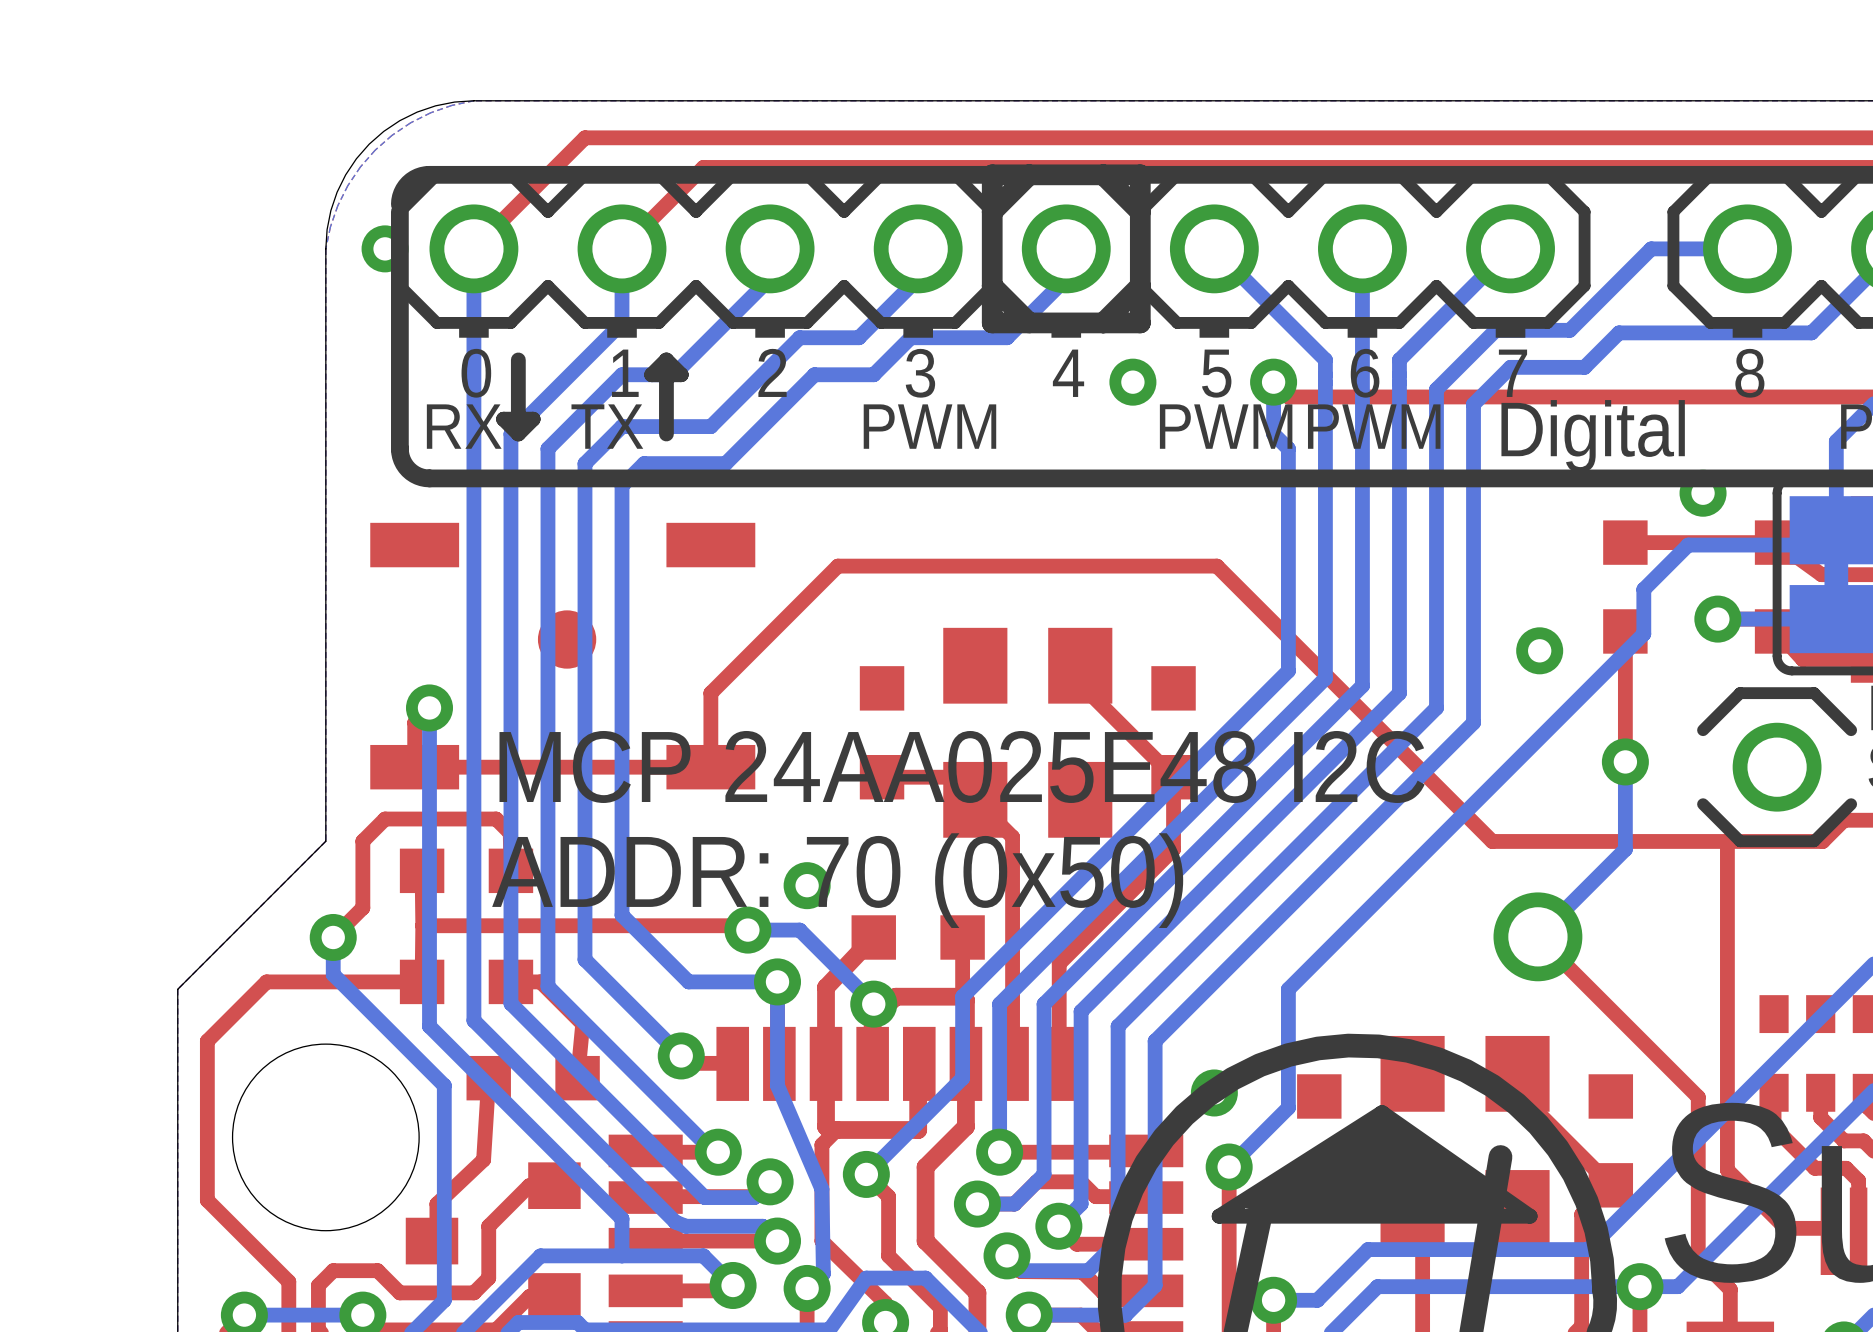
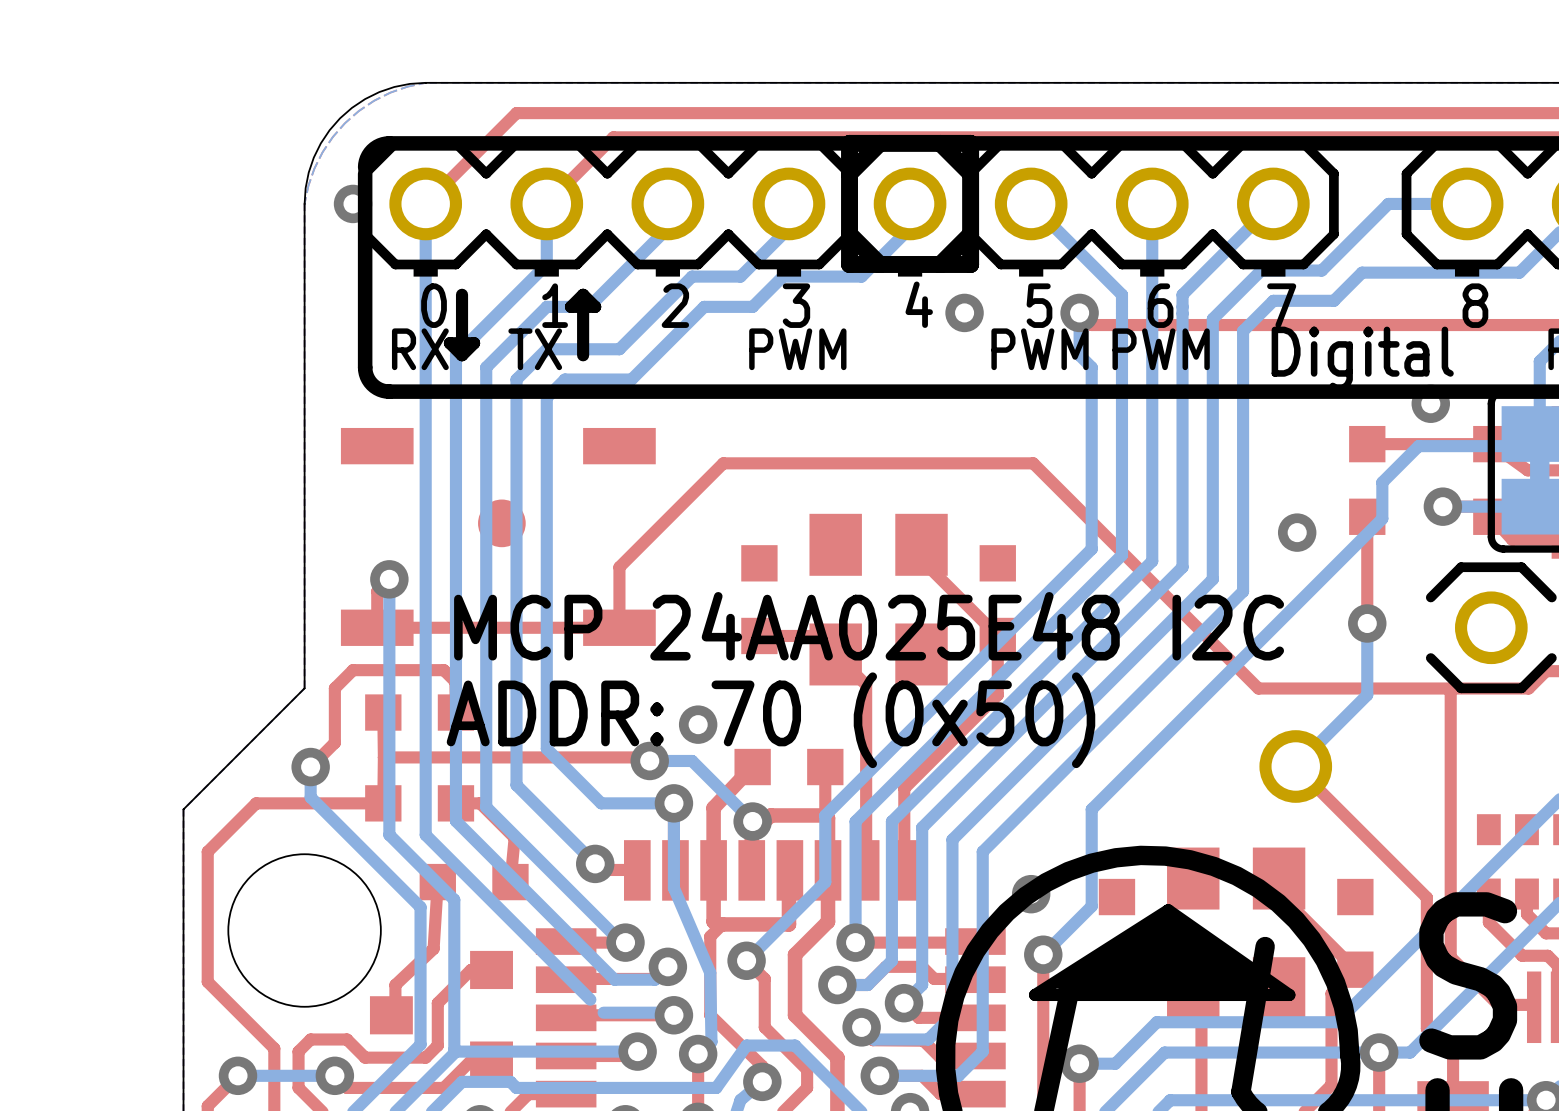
bottom track: (429, 1020) (429, 1026) (622, 1218) (622, 1255) -> (389, 834) (454, 899) (454, 1049) (455, 1051) (637, 1051)
bottom track: (444, 1085) (444, 1300) -> (401, 888) (420, 907) (420, 1044) (401, 1063)
bottom track: (675, 1222) (685, 1226) (762, 1226) (774, 1237) -> (603, 1012) (671, 1012)
bottom track: (733, 1285) (703, 1255) (540, 1255) (510, 1285) -> none

